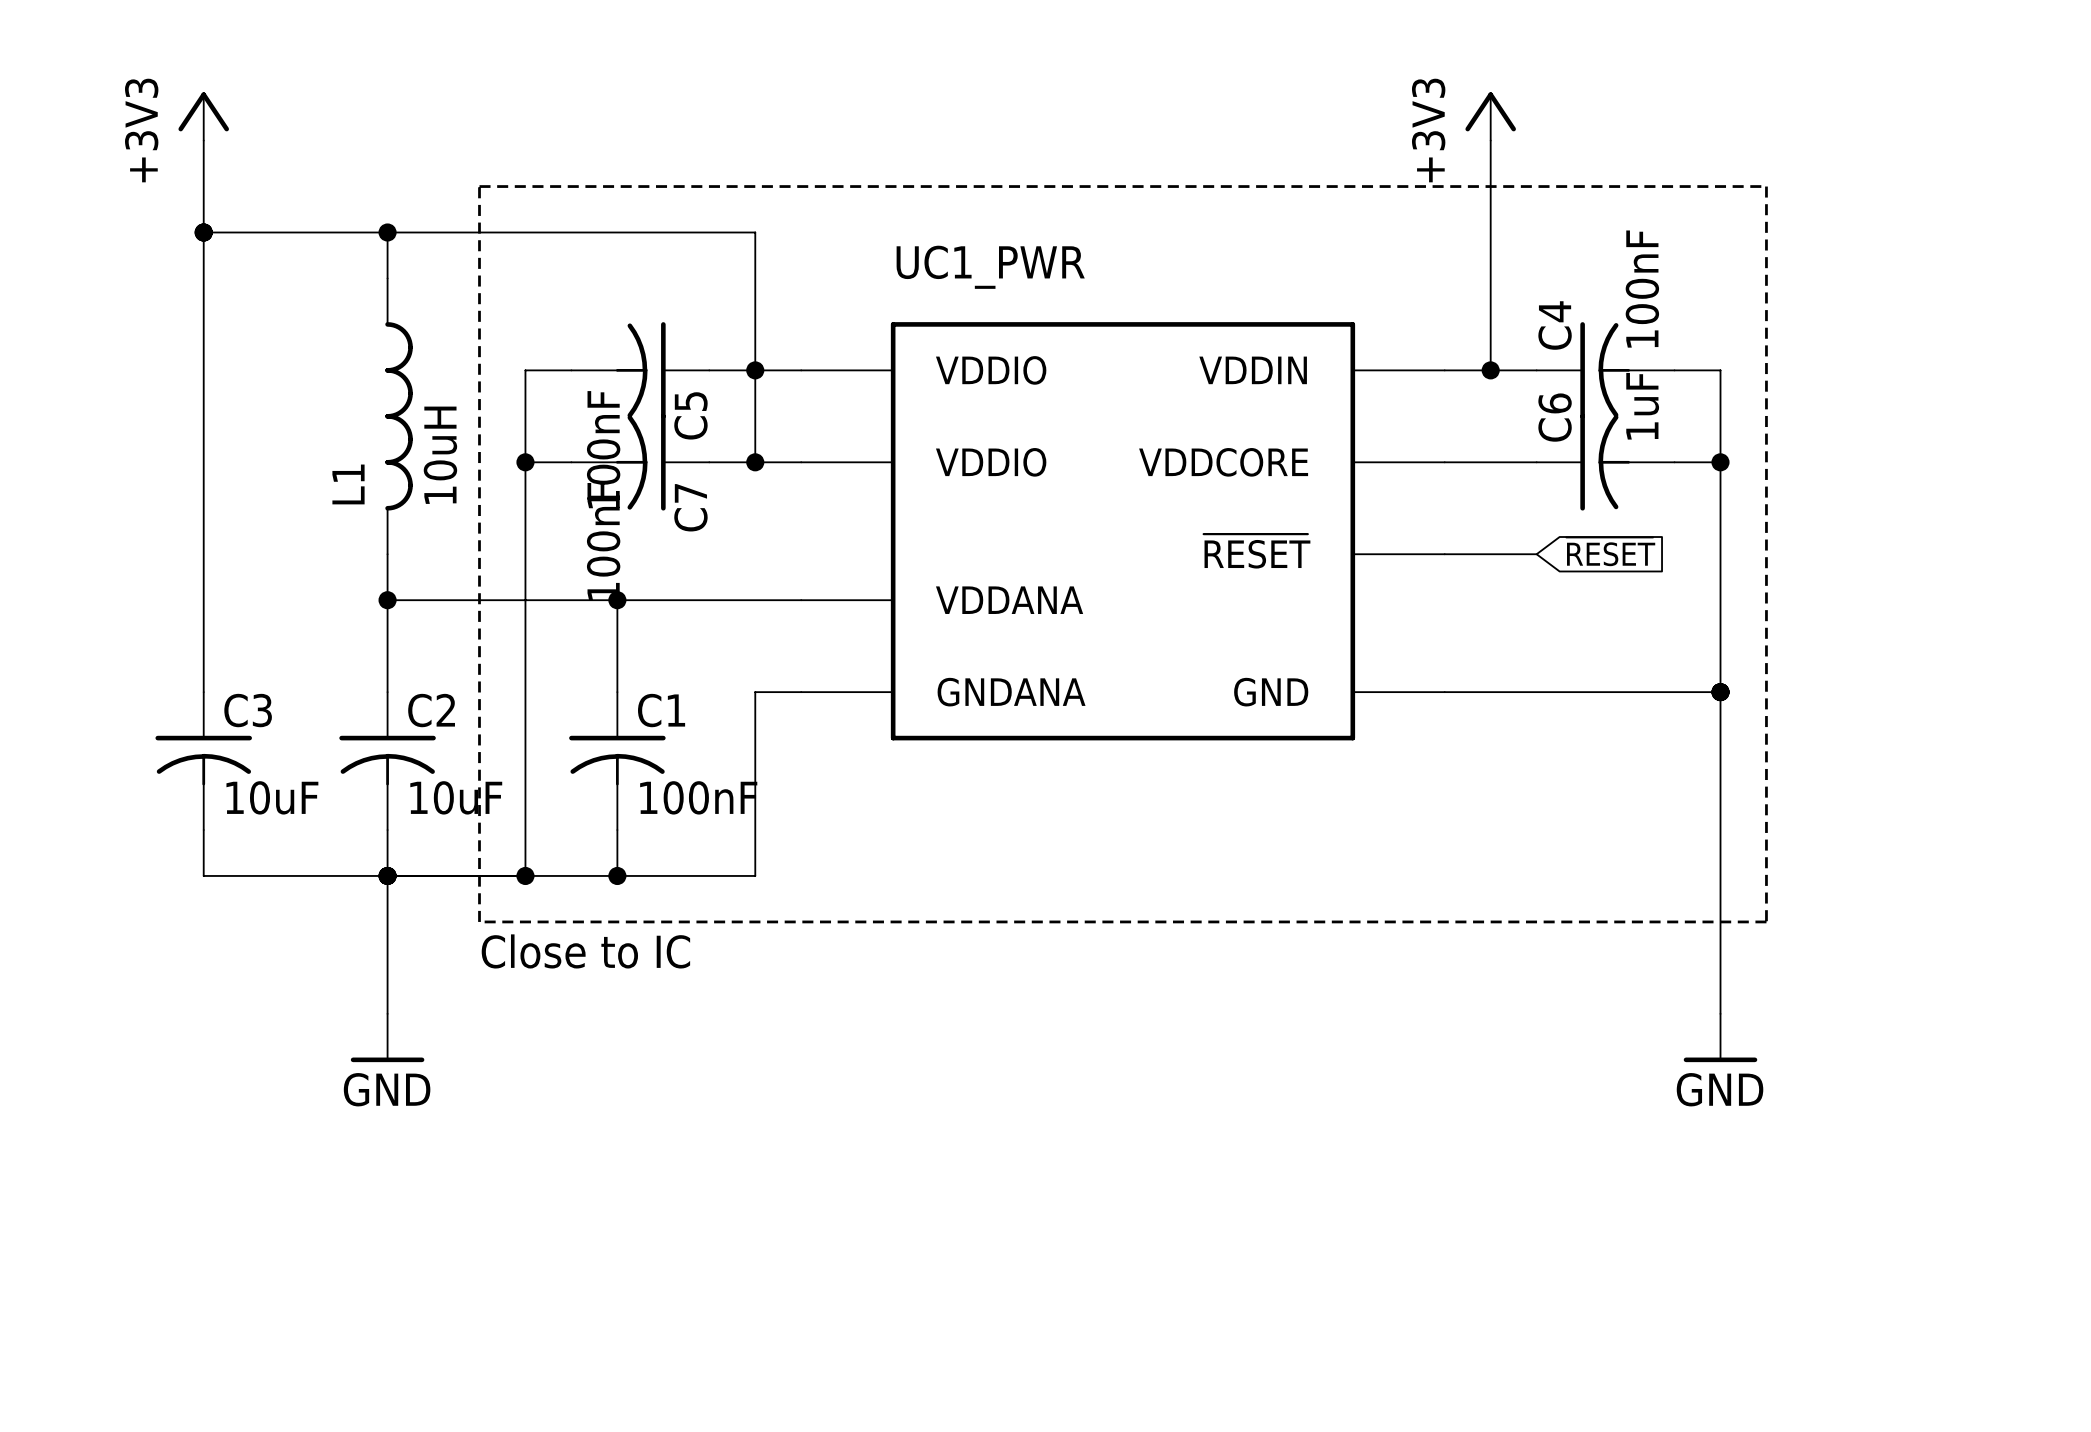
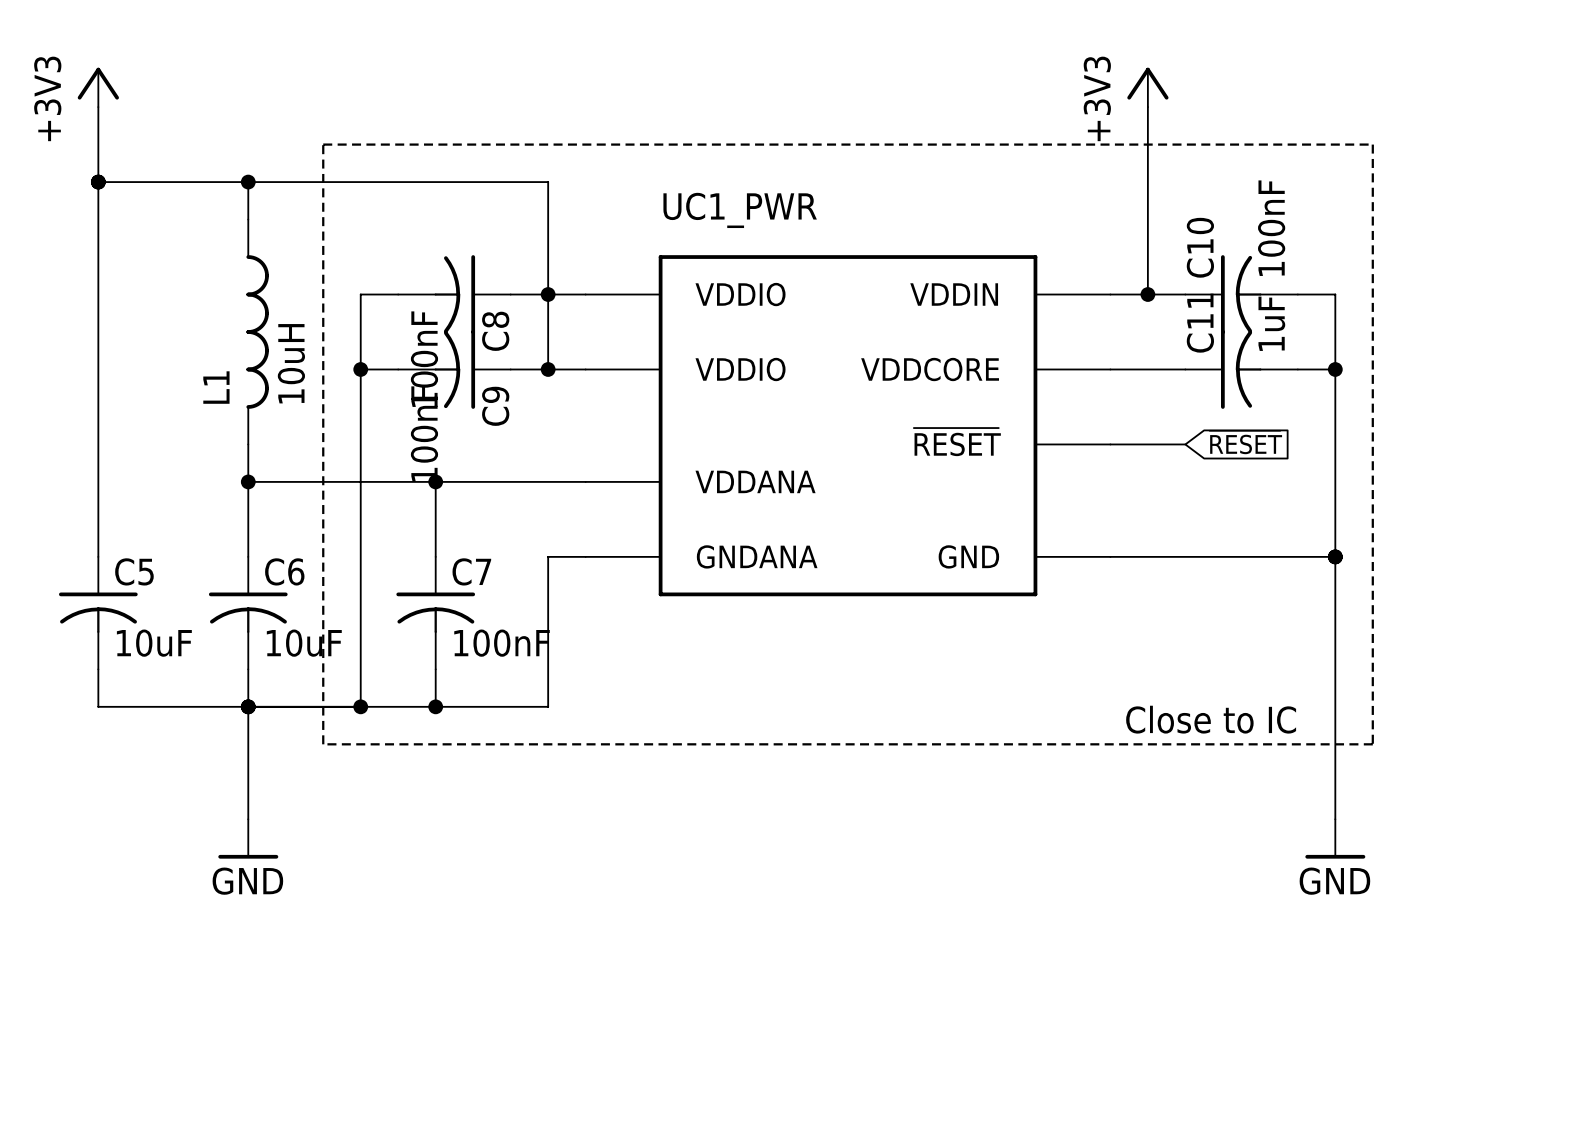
C4 name: C4 (1555, 325) -> C10 (1200, 247)
C5 name: C5 (690, 415) -> C8 (495, 331)
C6 name: C6 (1555, 417) -> C11 (1200, 323)
C7 name: C7 (690, 507) -> C9 (495, 406)
C3 name: C3 (248, 710) -> C5 (134, 571)
C2 name: C2 (431, 710) -> C6 (284, 571)
C1 name: C1 (661, 710) -> C7 (471, 571)
text: none -> Close to IC (1211, 719)
text: Close to IC (585, 951) -> none

